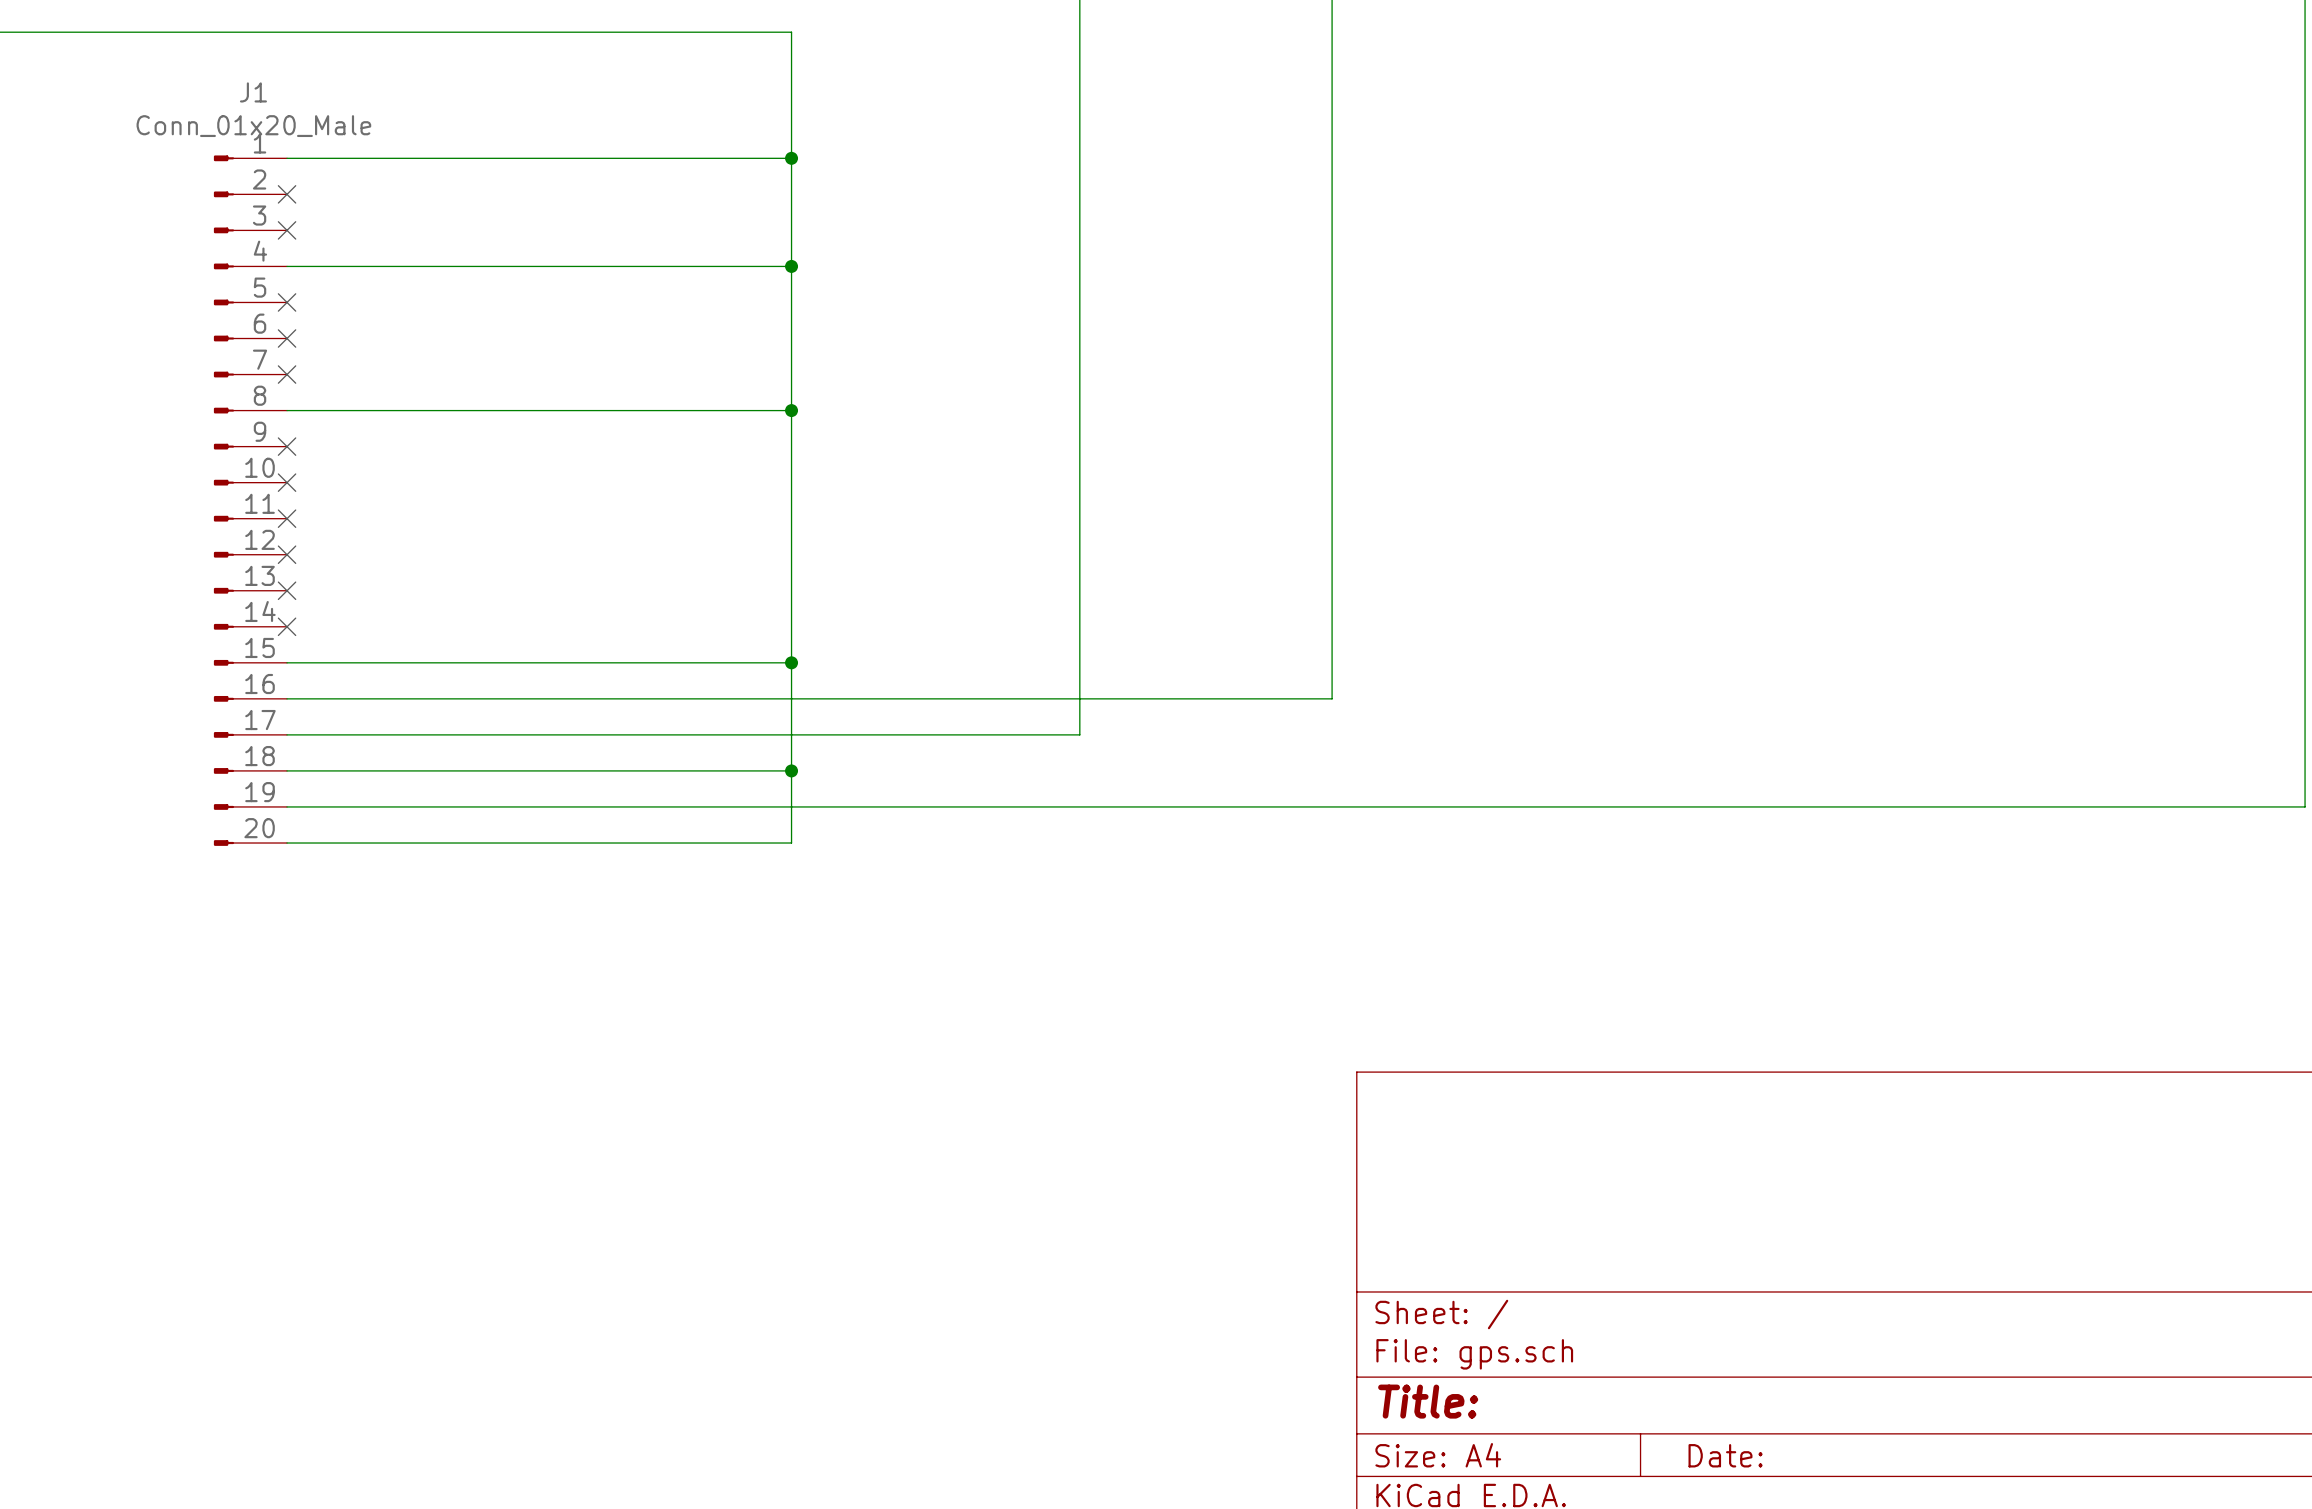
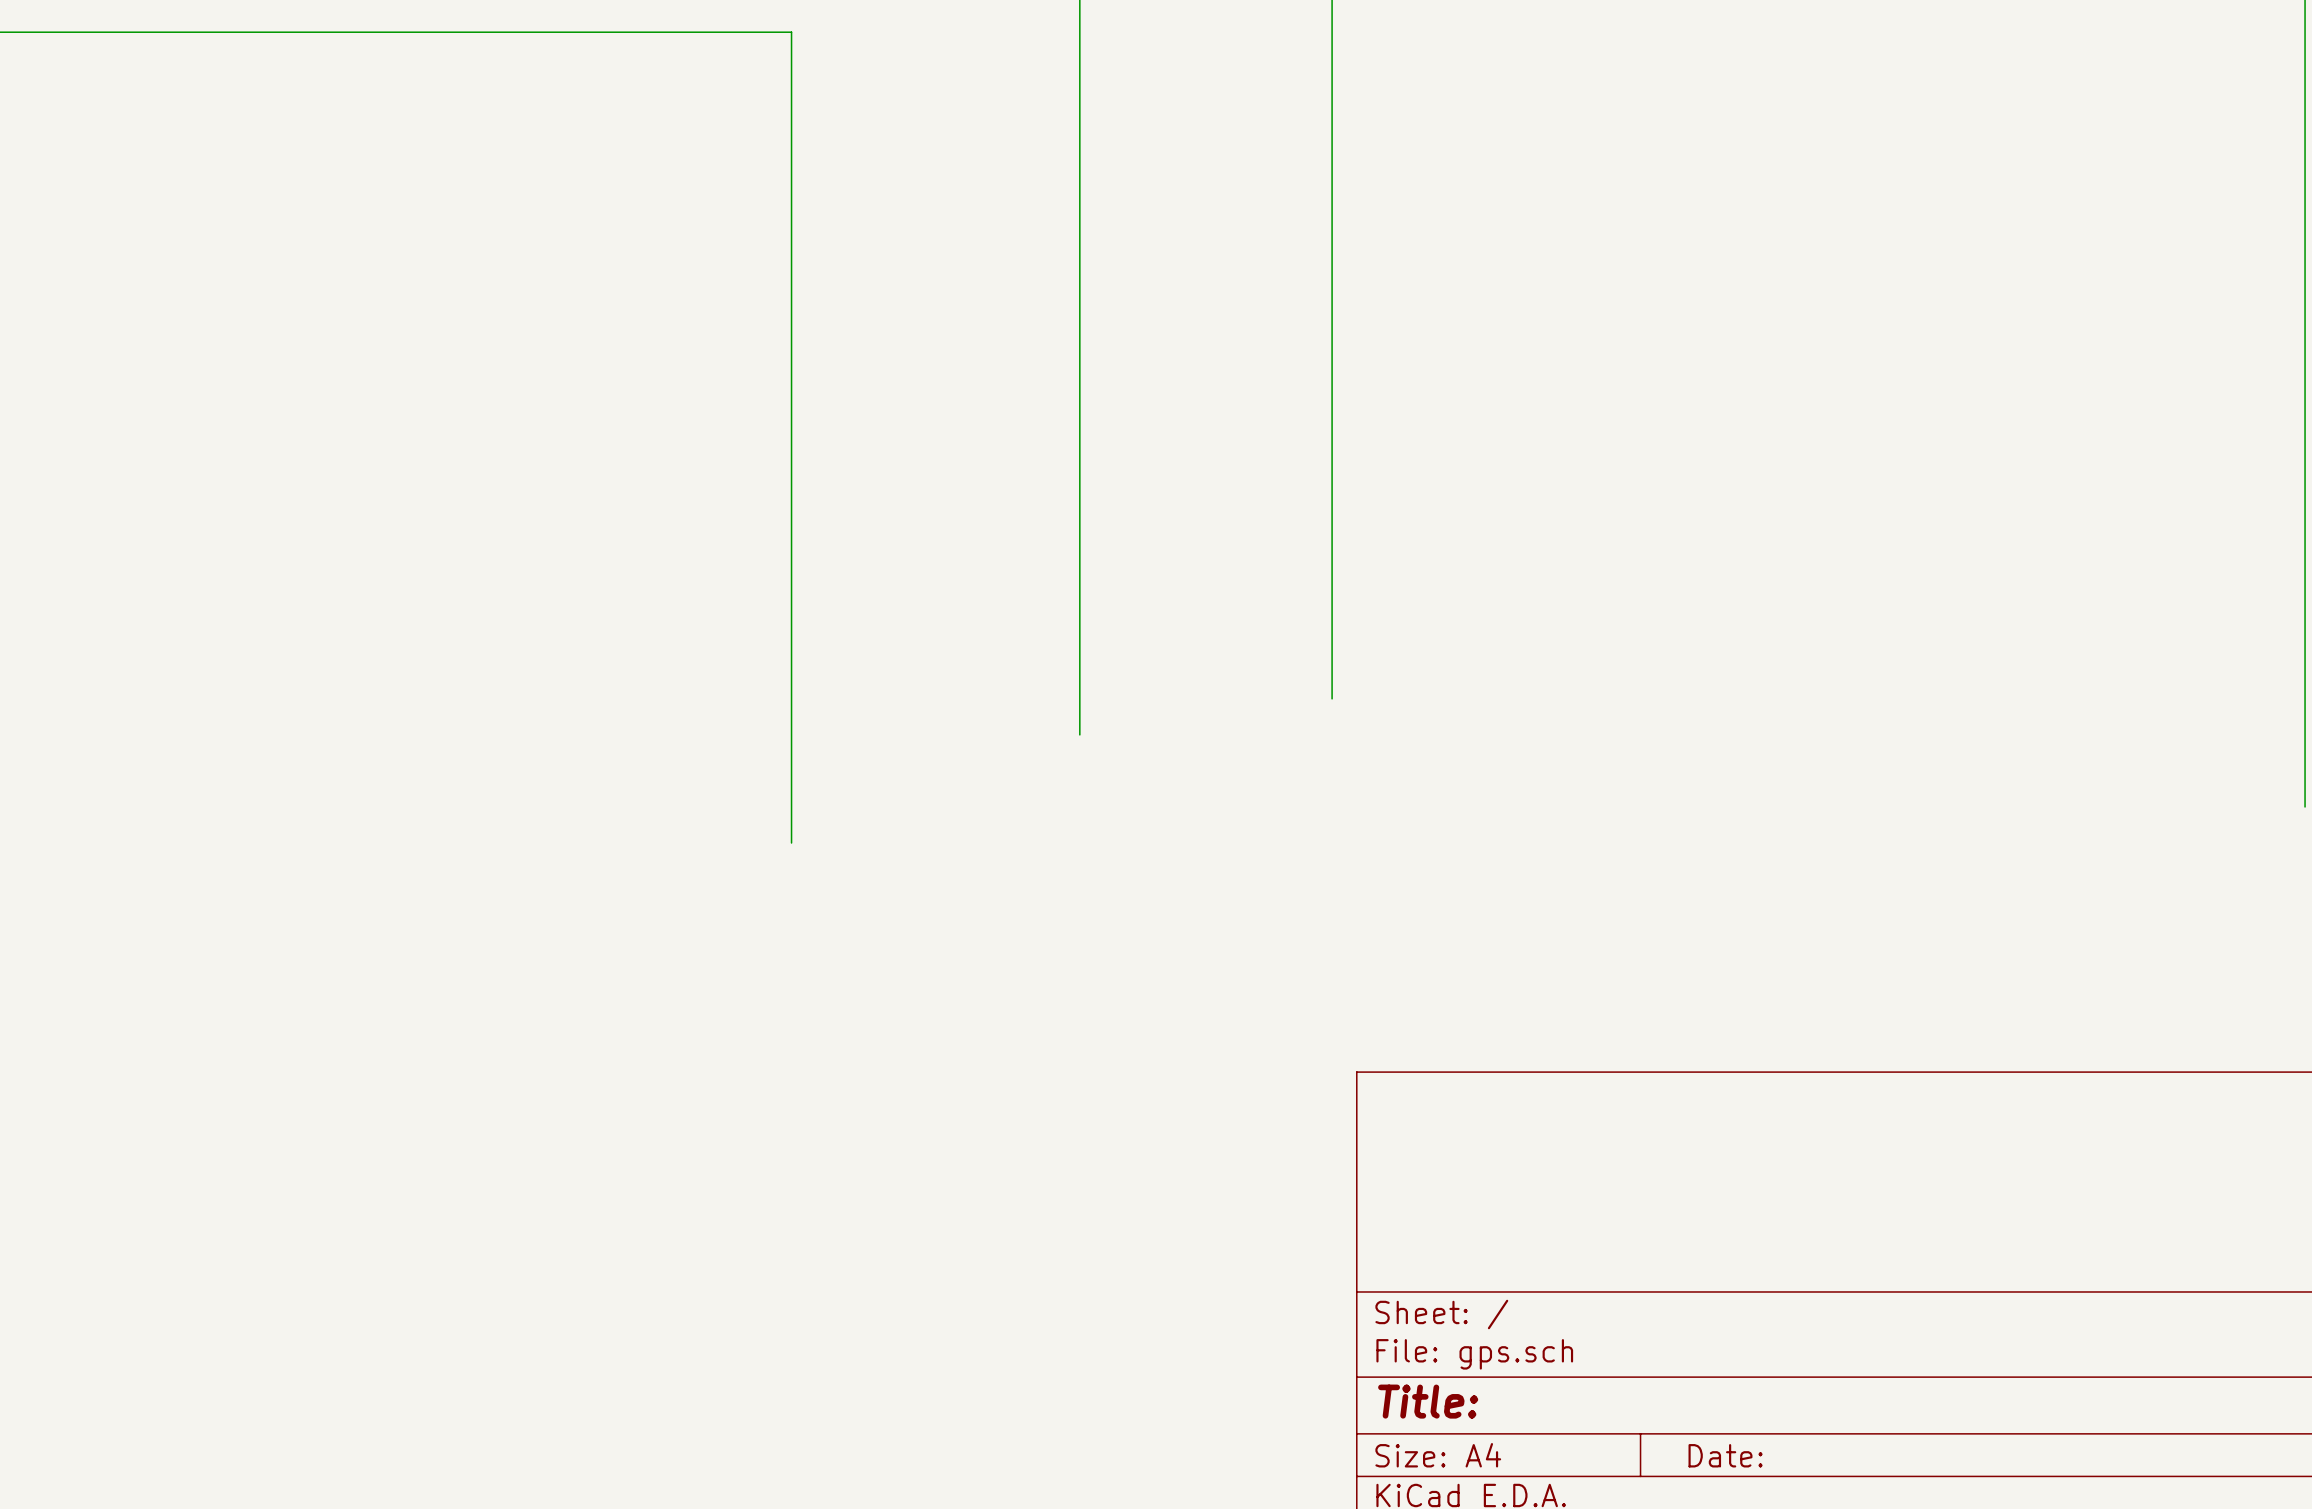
wire: (287, 158) (791, 158) -> none
junction: (791, 158) -> none
no-connect mark: (287, 194) -> none
no-connect mark: (287, 230) -> none
wire: (287, 266) (791, 266) -> none
junction: (791, 266) -> none
no-connect mark: (287, 302) -> none
no-connect mark: (287, 338) -> none
no-connect mark: (287, 374) -> none
wire: (287, 410) (791, 410) -> none
junction: (791, 410) -> none
no-connect mark: (287, 446) -> none
no-connect mark: (287, 482) -> none
J1: Conn_01x20_Male (250, 500) -> none
no-connect mark: (287, 518) -> none
no-connect mark: (287, 554) -> none
no-connect mark: (287, 590) -> none
no-connect mark: (287, 626) -> none
wire: (287, 662) (791, 662) -> none
junction: (791, 662) -> none
wire: (287, 698) (1332, 698) -> none
wire: (287, 734) (1079, 734) -> none
wire: (287, 770) (791, 770) -> none
junction: (791, 770) -> none
wire: (287, 806) (2305, 806) -> none
wire: (287, 843) (791, 843) -> none

